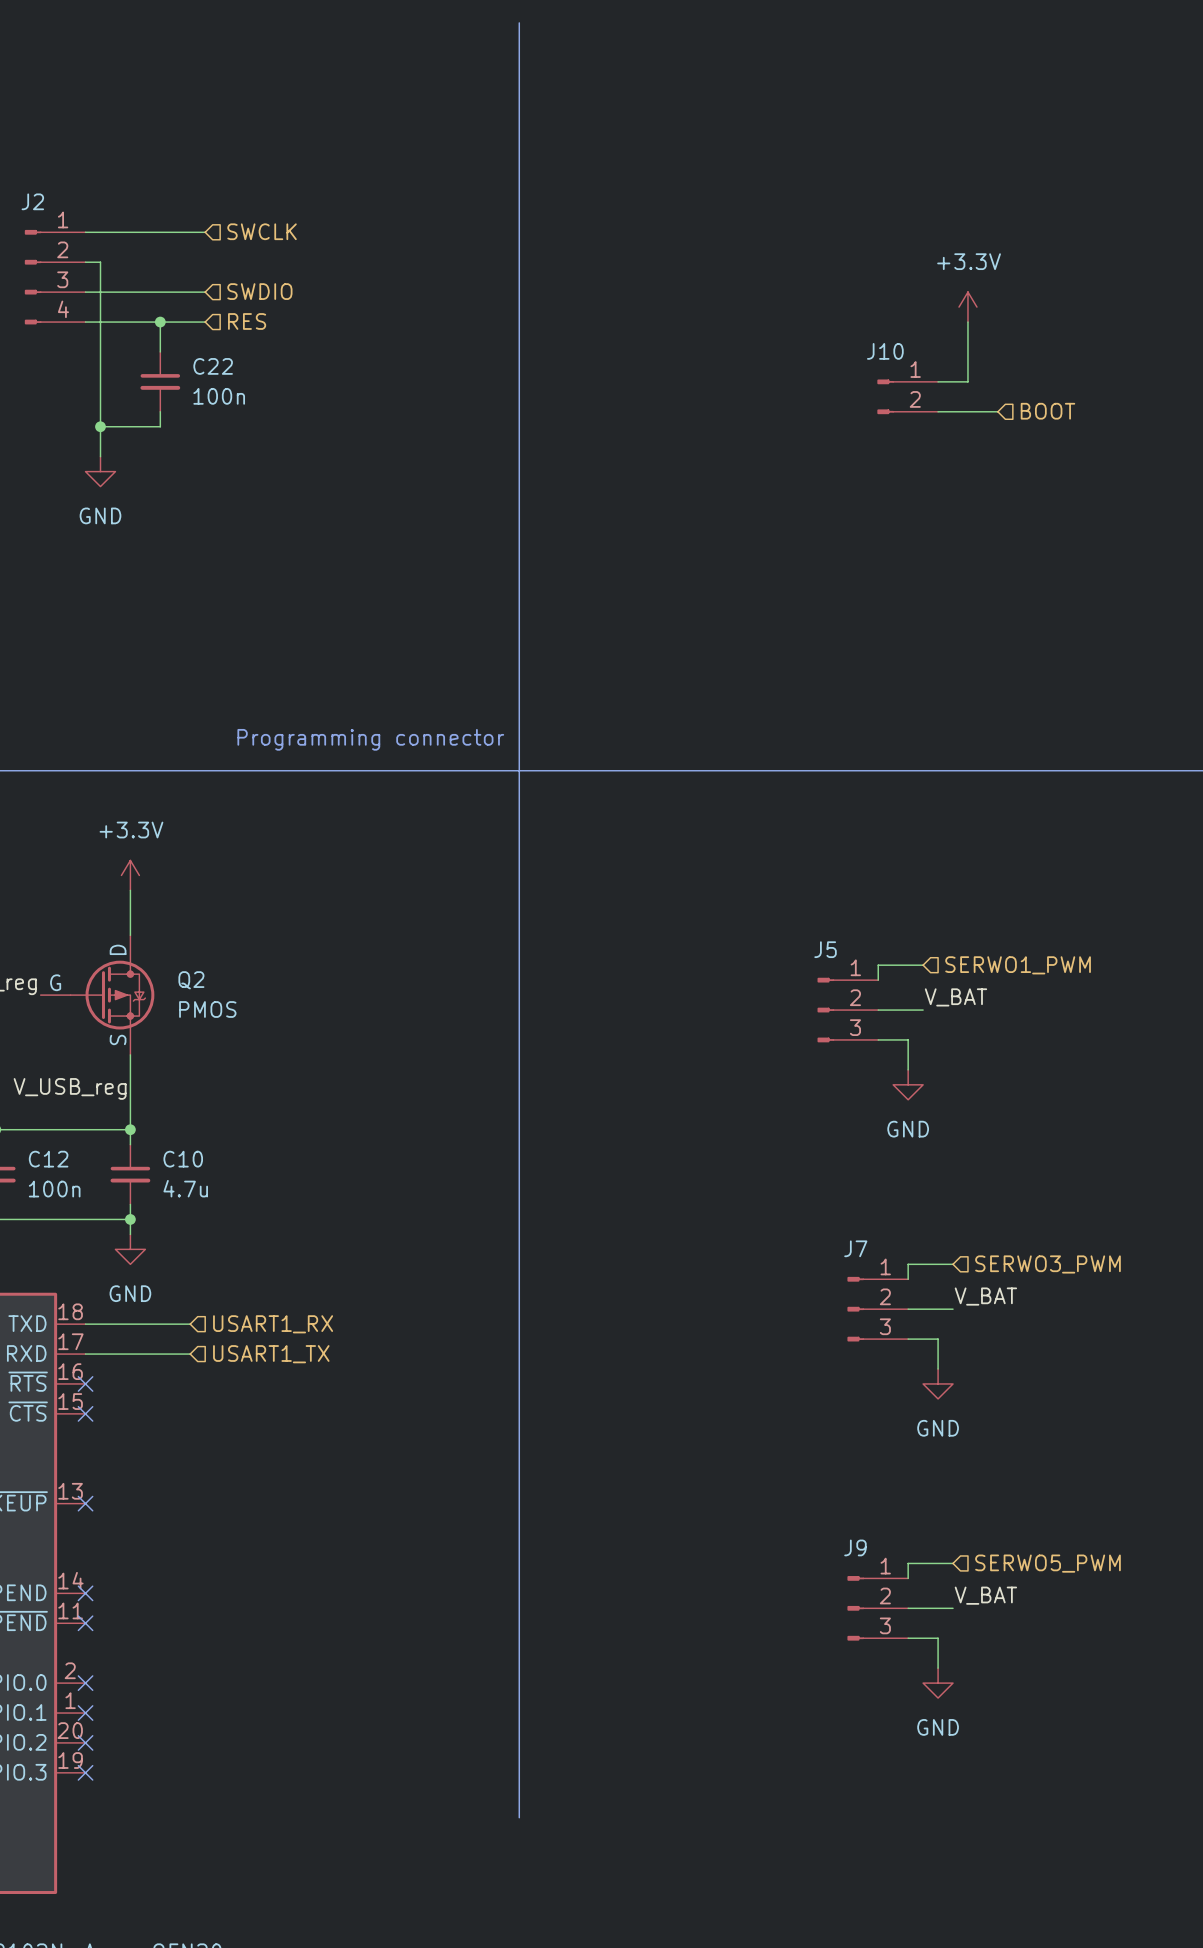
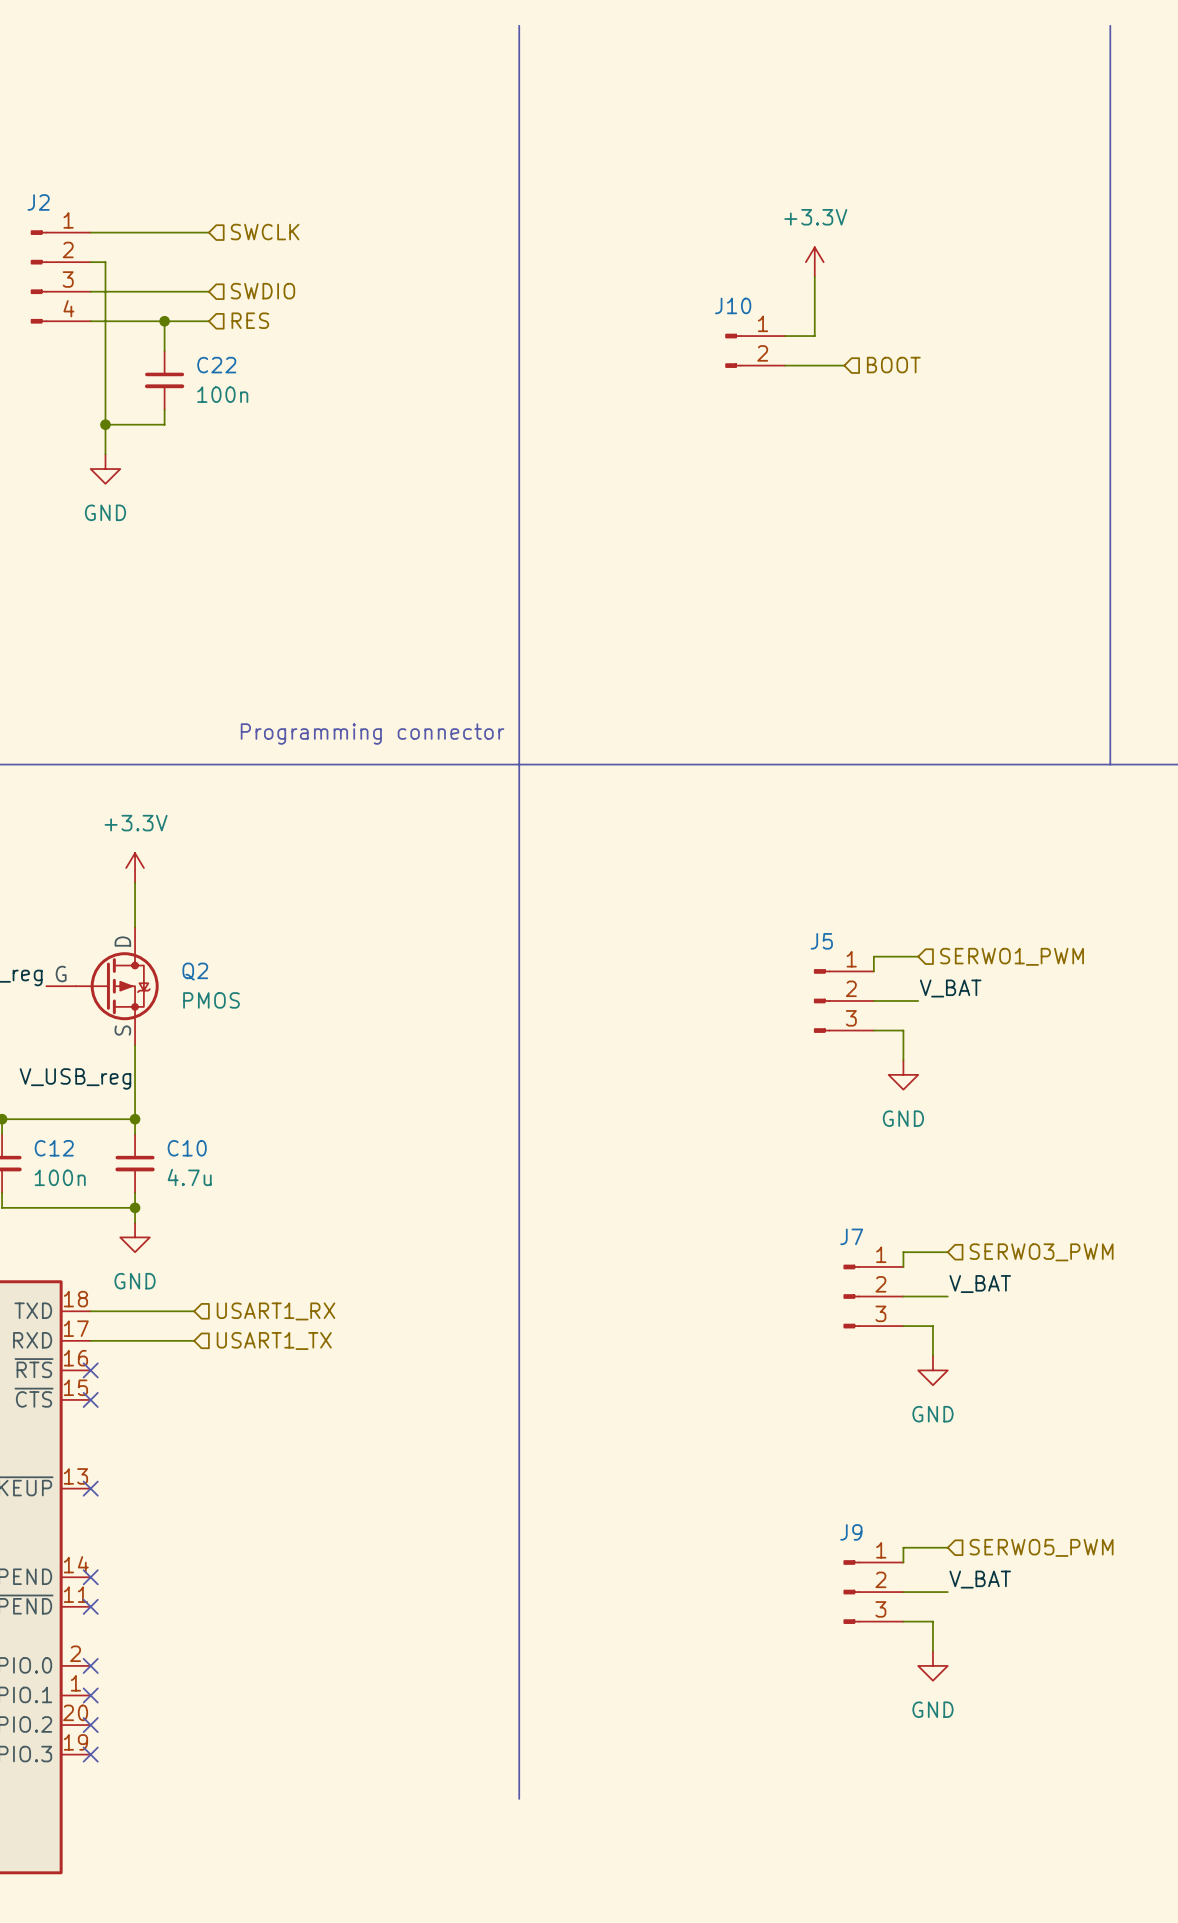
line: none -> (1110, 25) (1110, 764)
power symbol position: +3.3V (967, 307) -> +3.3V (814, 262)
wire: (967, 322) (967, 381) (938, 381) -> (814, 276) (814, 336) (785, 336)
J10 position: (907, 396) -> (755, 350)
wire: (938, 411) (997, 411) -> (785, 365) (844, 365)
hierarchical label position: BOOT (1047, 411) -> BOOT (893, 365)

